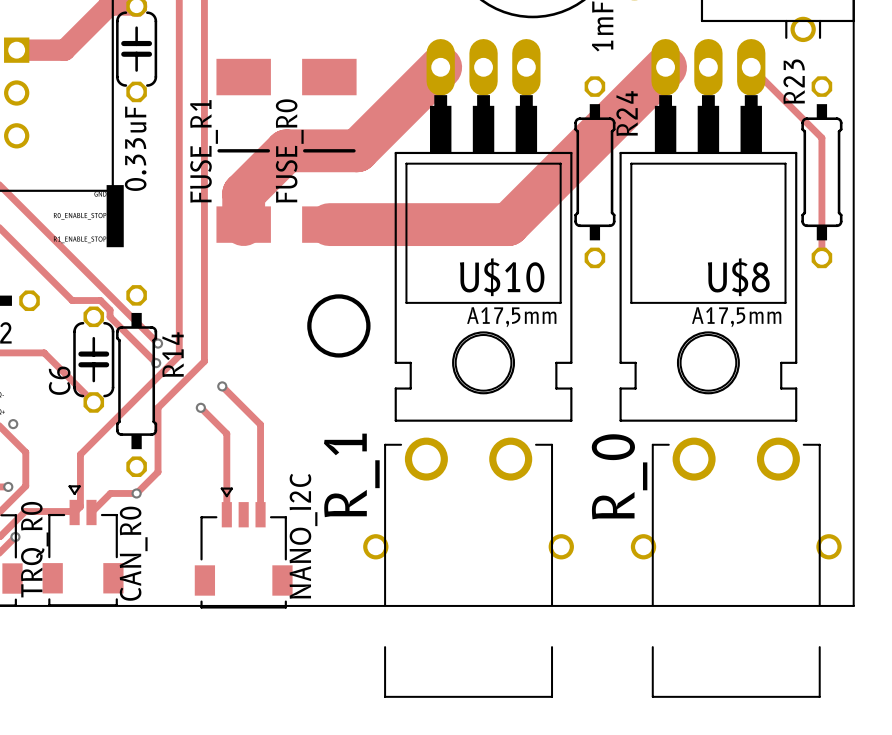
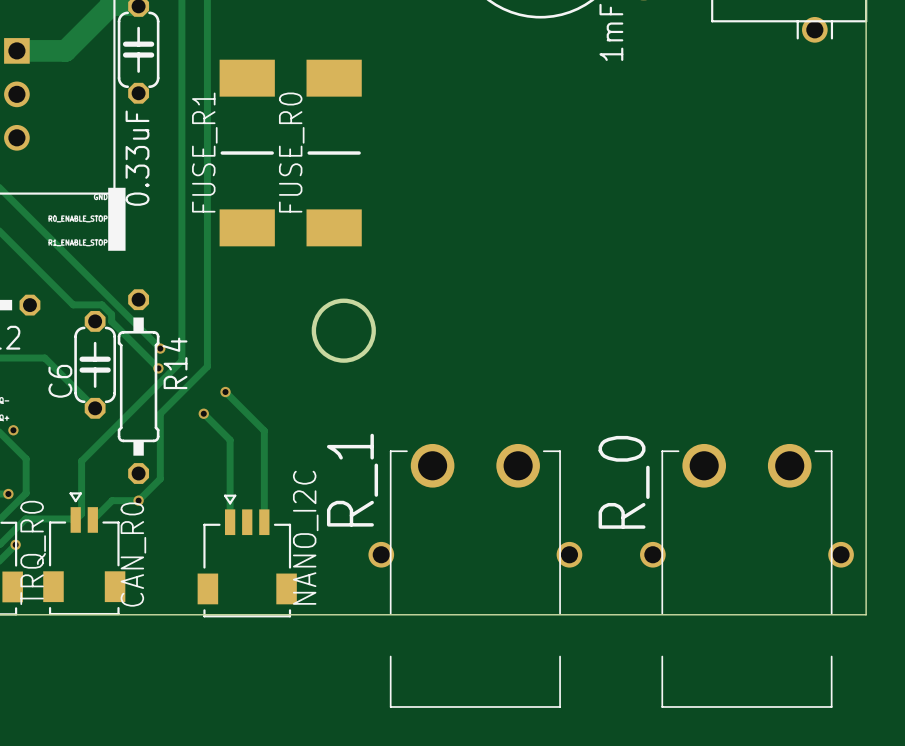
track: (440, 67) (357, 150) (286, 150) (243, 193) (243, 224) -> none
track: (665, 67) (508, 224) (329, 224) -> none
track: (751, 67) (821, 137) (821, 257) -> none
R24: (594, 172) -> none
R23: (821, 172) -> none
U$10: (483, 230) -> none
U$8: (708, 230) -> none

